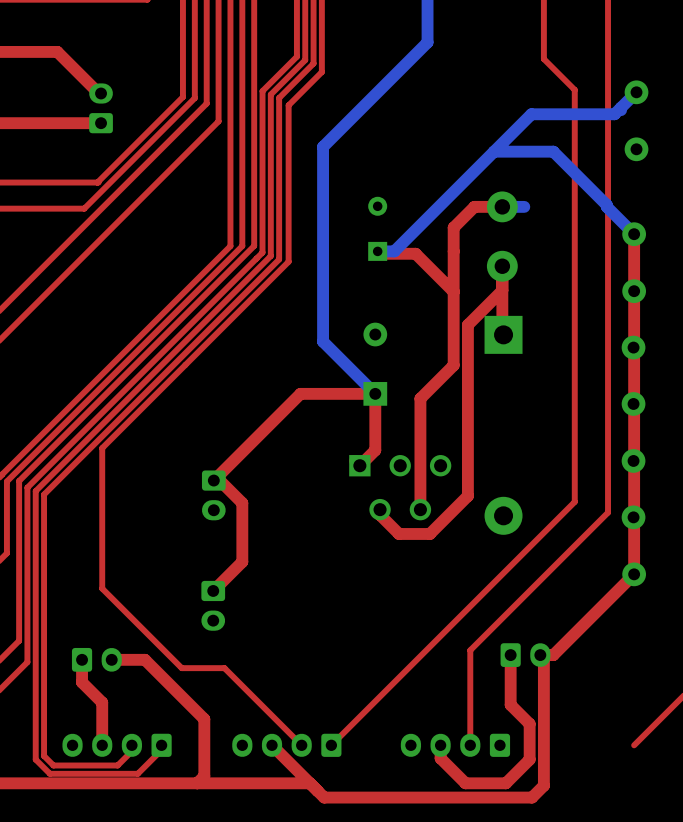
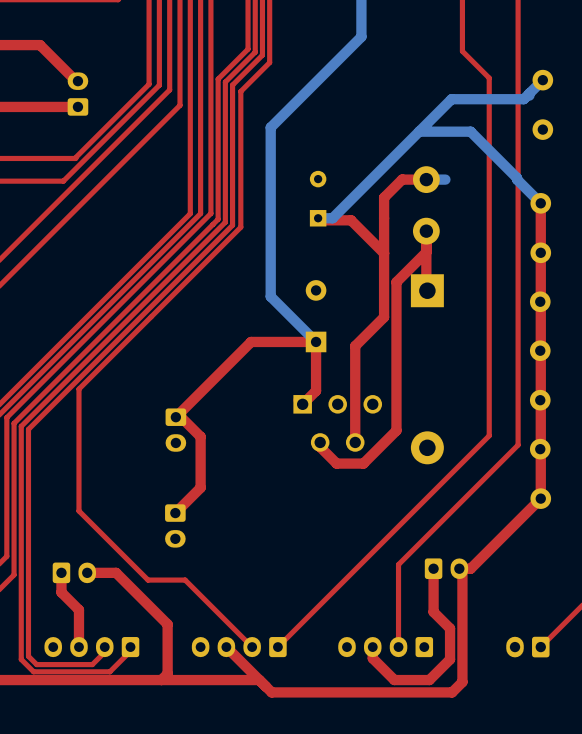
part: none -> (527, 647)

